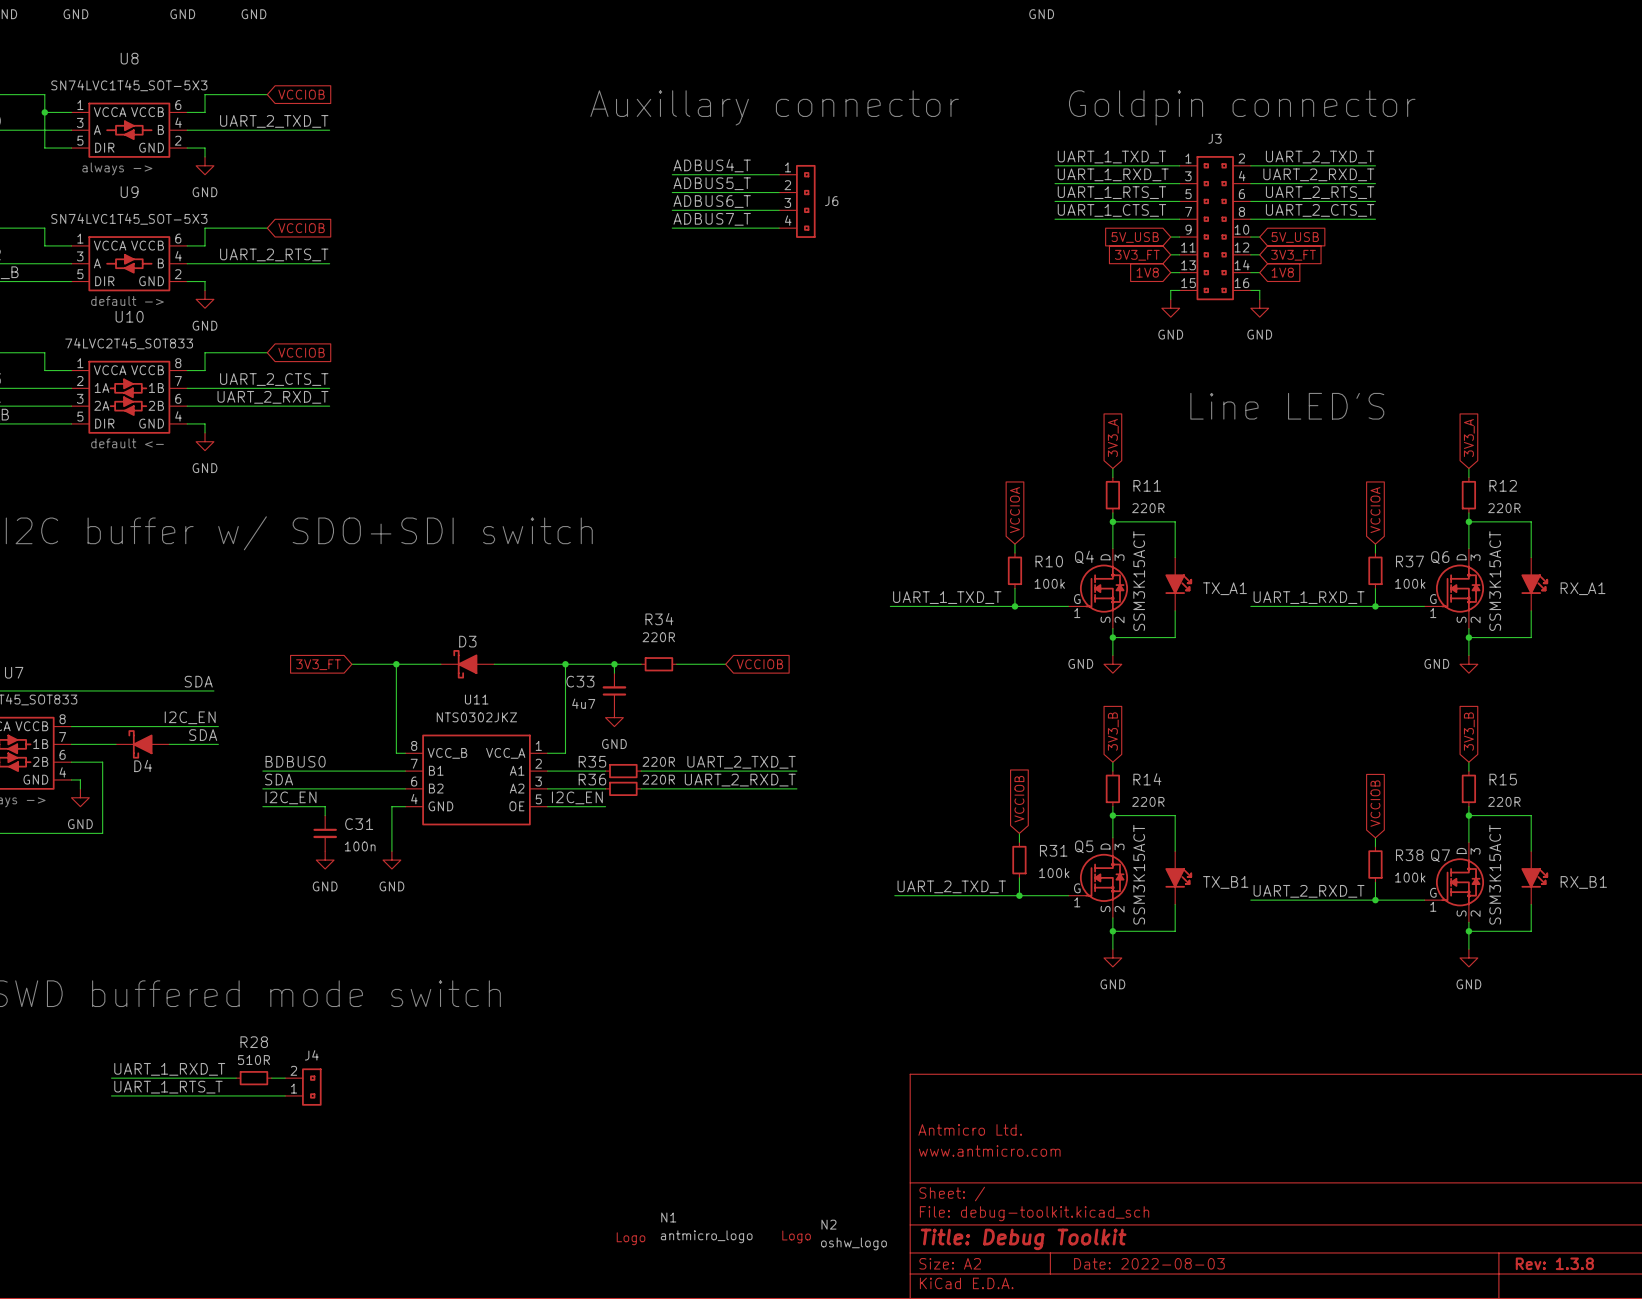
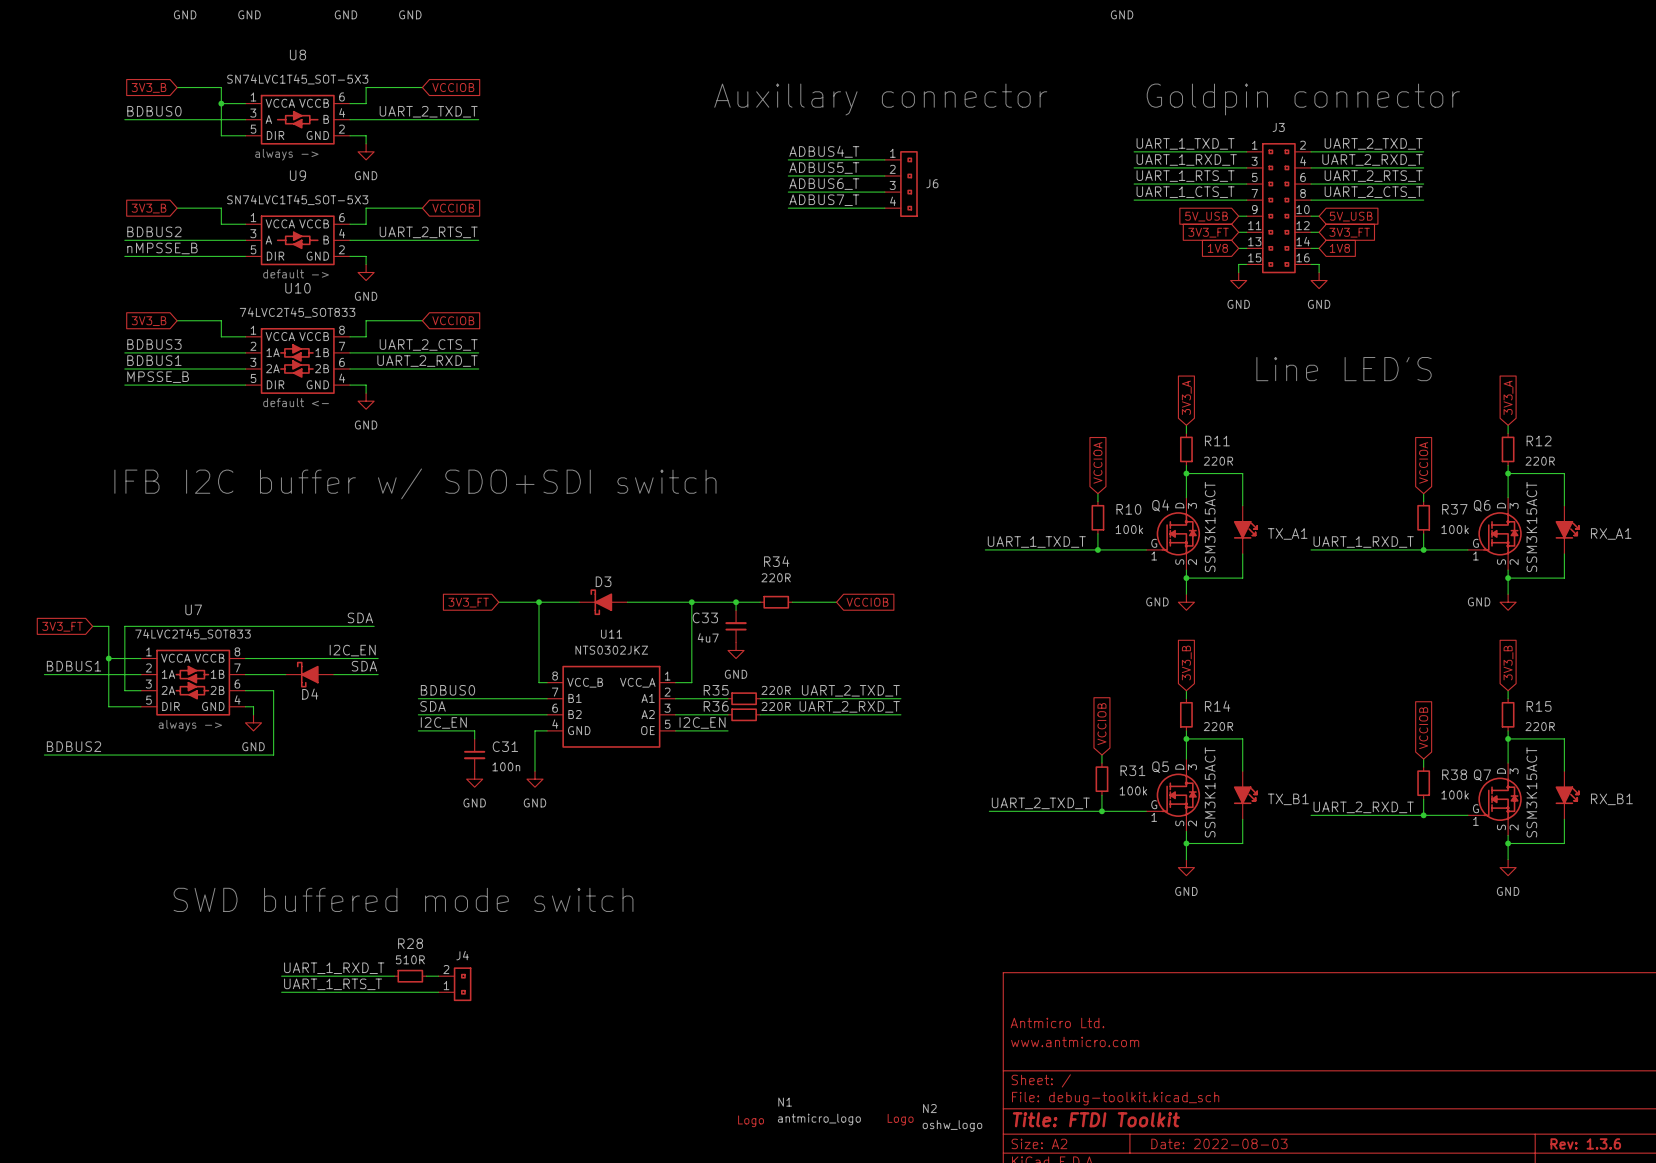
title block: Title: Debug Toolkit (1023, 1239) -> Title: FTDI Toolkit (1096, 1119)
title block: Rev: 1.3.8 (1554, 1263) -> Rev: 1.3.6 (1585, 1143)

